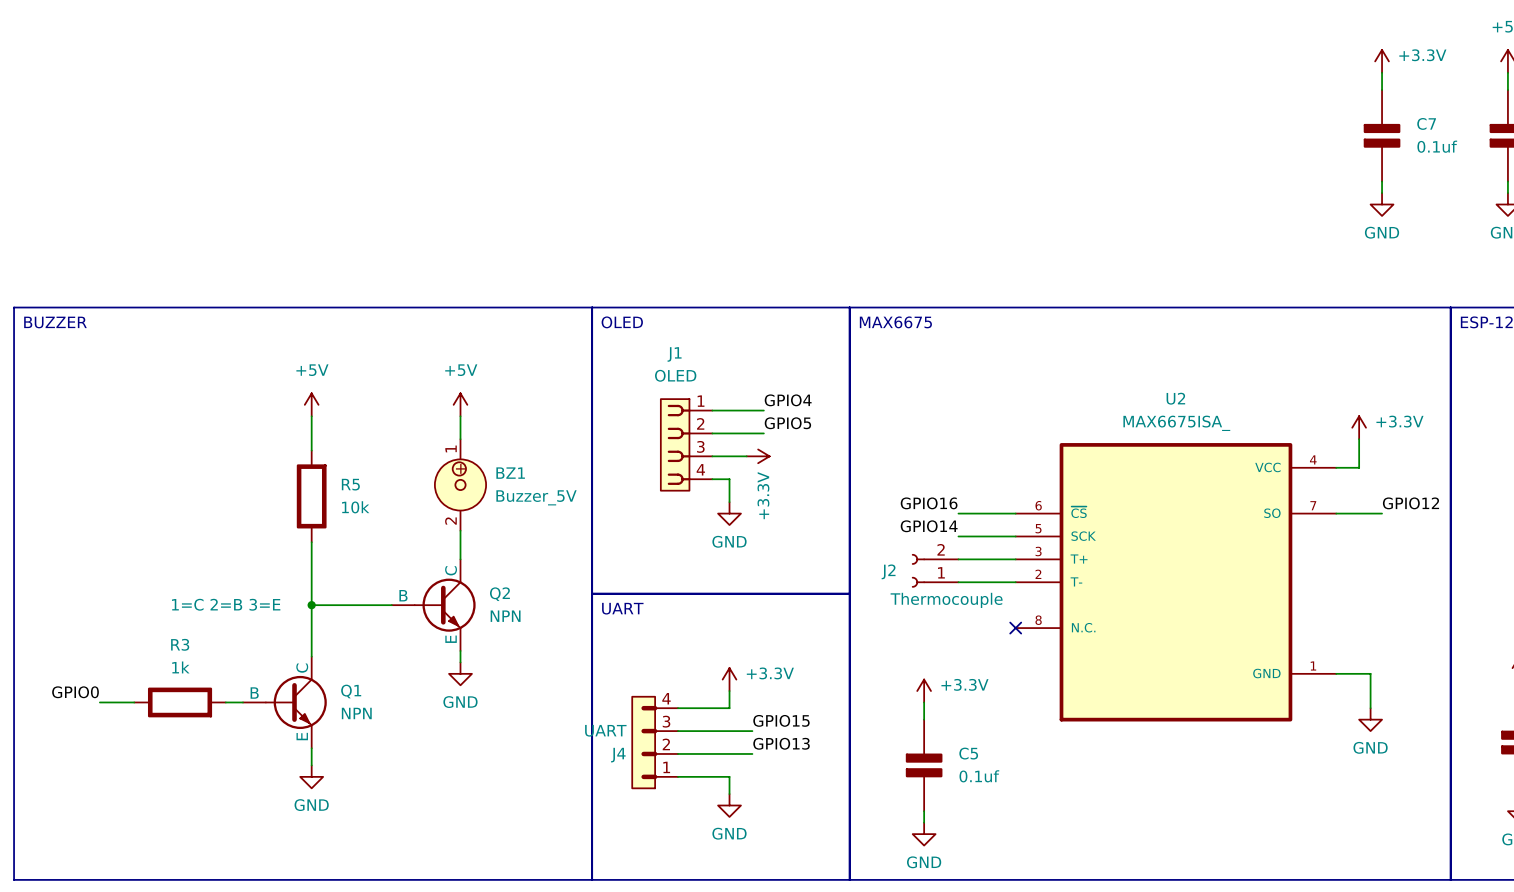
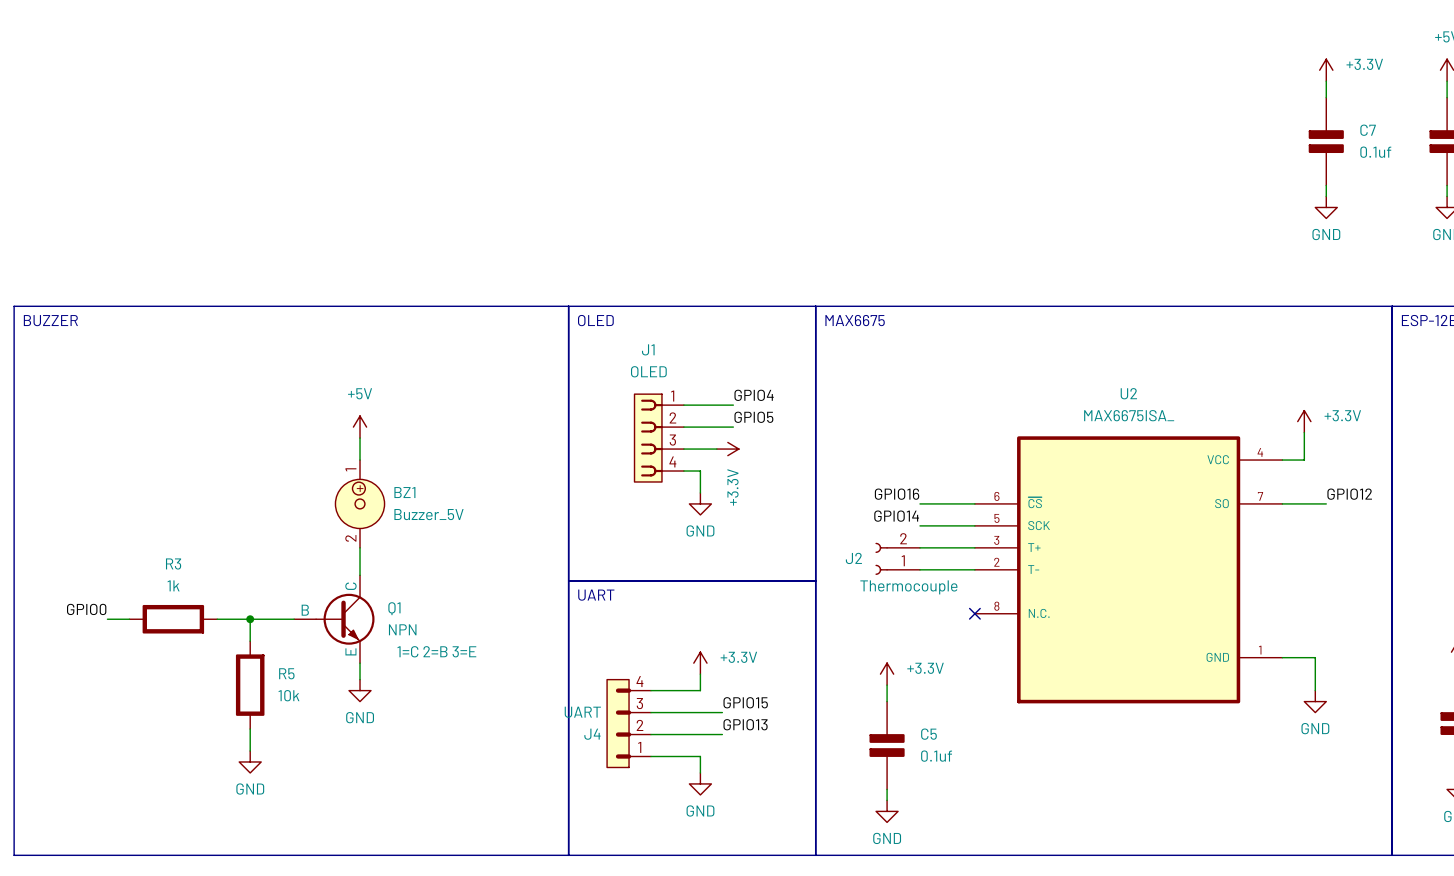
power symbol: +5V (311, 404) -> none
power symbol: +5V (460, 404) -> none
wire: (311, 416) (311, 450) -> none
wire: (460, 416) (460, 439) -> (360, 438) (360, 460)
power symbol: none -> +5V (360, 427)
BZ1 position: (460, 484) -> (360, 503)
R5 position: (311, 496) -> (250, 685)
wire: (460, 530) (460, 559) -> (360, 547) (360, 575)
wire: (311, 542) (311, 656) -> none
Q1 text position: 1=C 2=B 3=E (226, 604) -> 1=C 2=B 3=E (436, 651)
wire: (311, 605) (391, 605) -> (217, 619) (294, 619)
junction: (311, 605) -> none
Q2: NPN (433, 605) -> none
wire: none -> (107, 619) (129, 619)
wire: none -> (250, 619) (250, 641)
junction: none -> (250, 619)
wire: (460, 650) (460, 662) -> none
power symbol: GND (460, 673) -> none
label position: GPIO0 (75, 692) -> GPIO0 (86, 609)
wire: (99, 702) (134, 702) -> none
R3 position: (180, 702) -> (173, 619)
wire: (225, 702) (242, 702) -> none
Q1 position: (284, 702) -> (334, 619)
power symbol: none -> GND (360, 690)
wire: none -> (250, 729) (250, 751)
wire: (311, 748) (311, 765) -> (360, 663) (360, 679)
power symbol: GND (311, 776) -> none
power symbol: none -> GND (250, 761)

